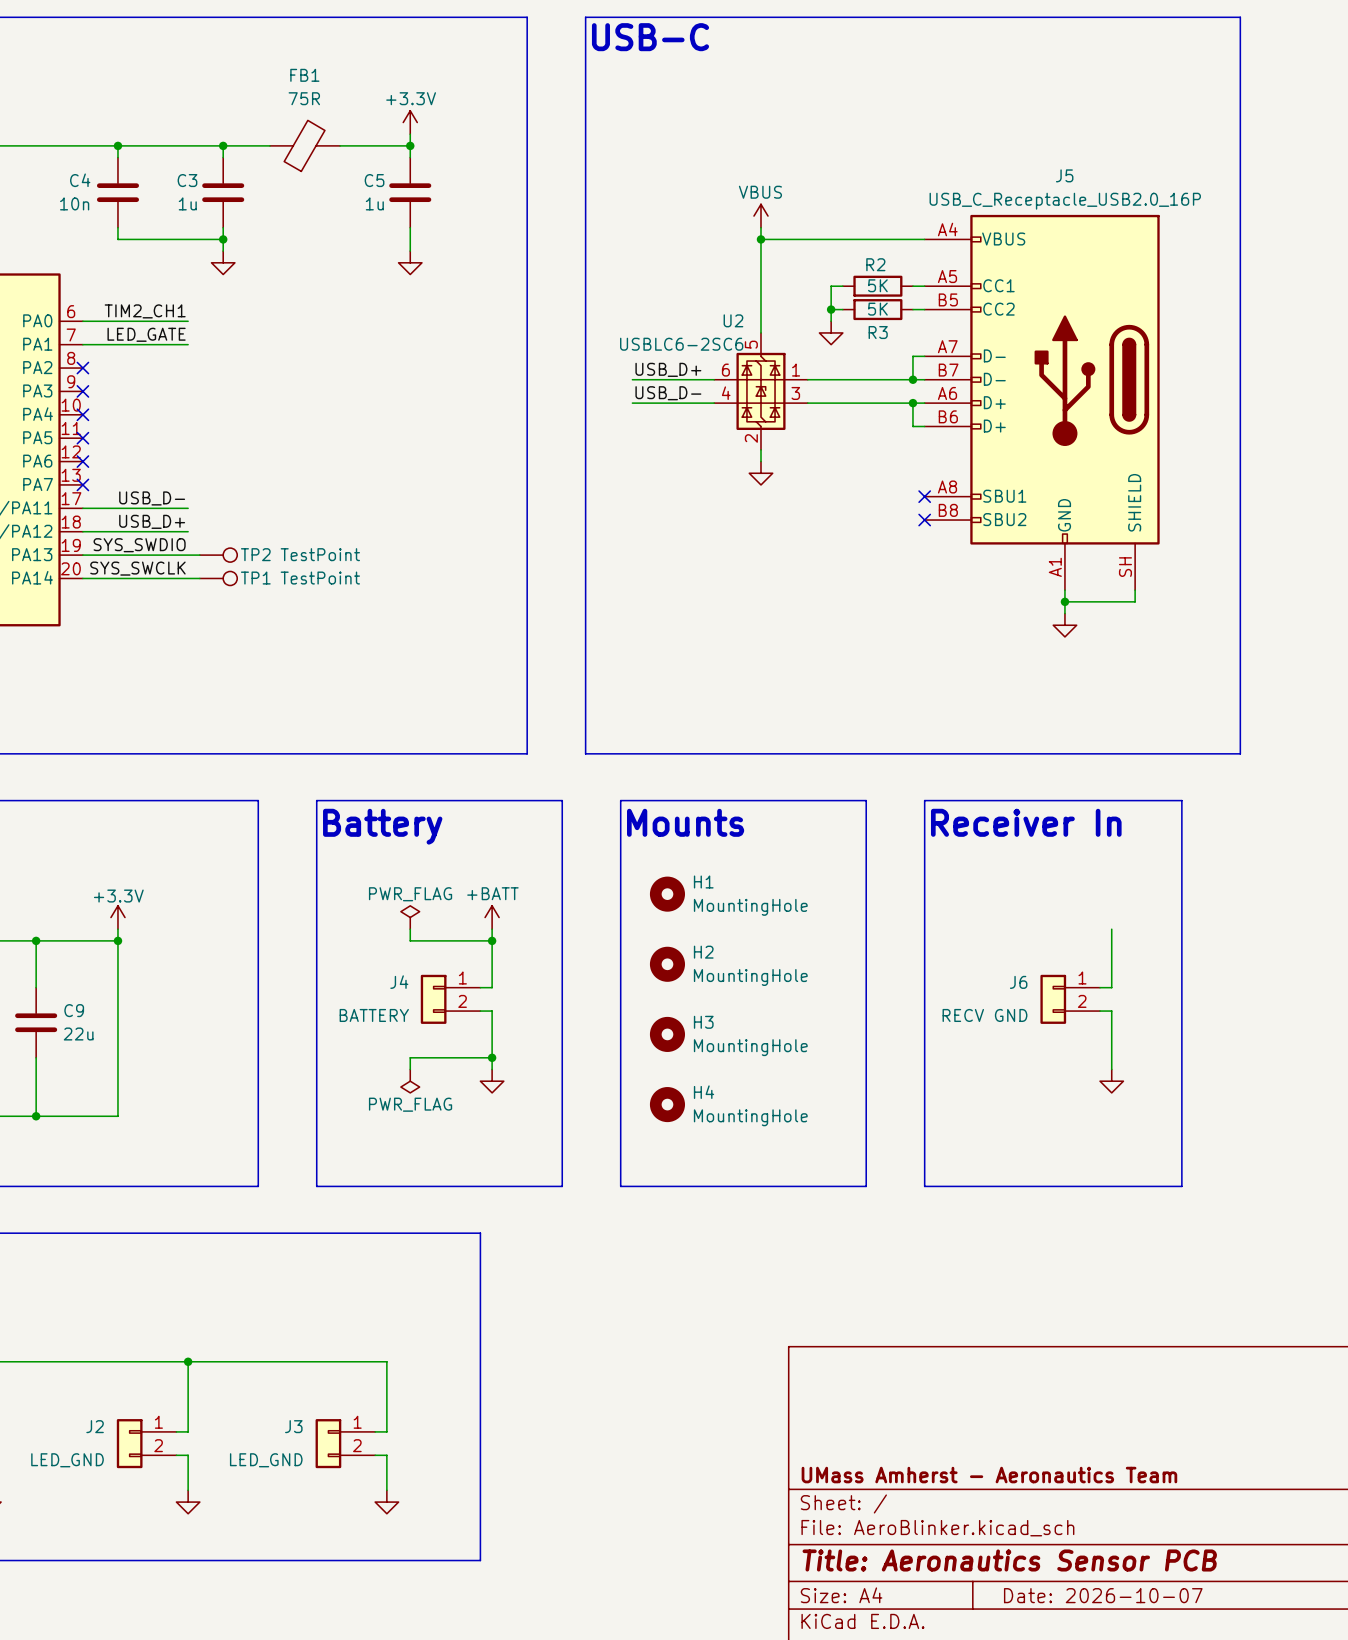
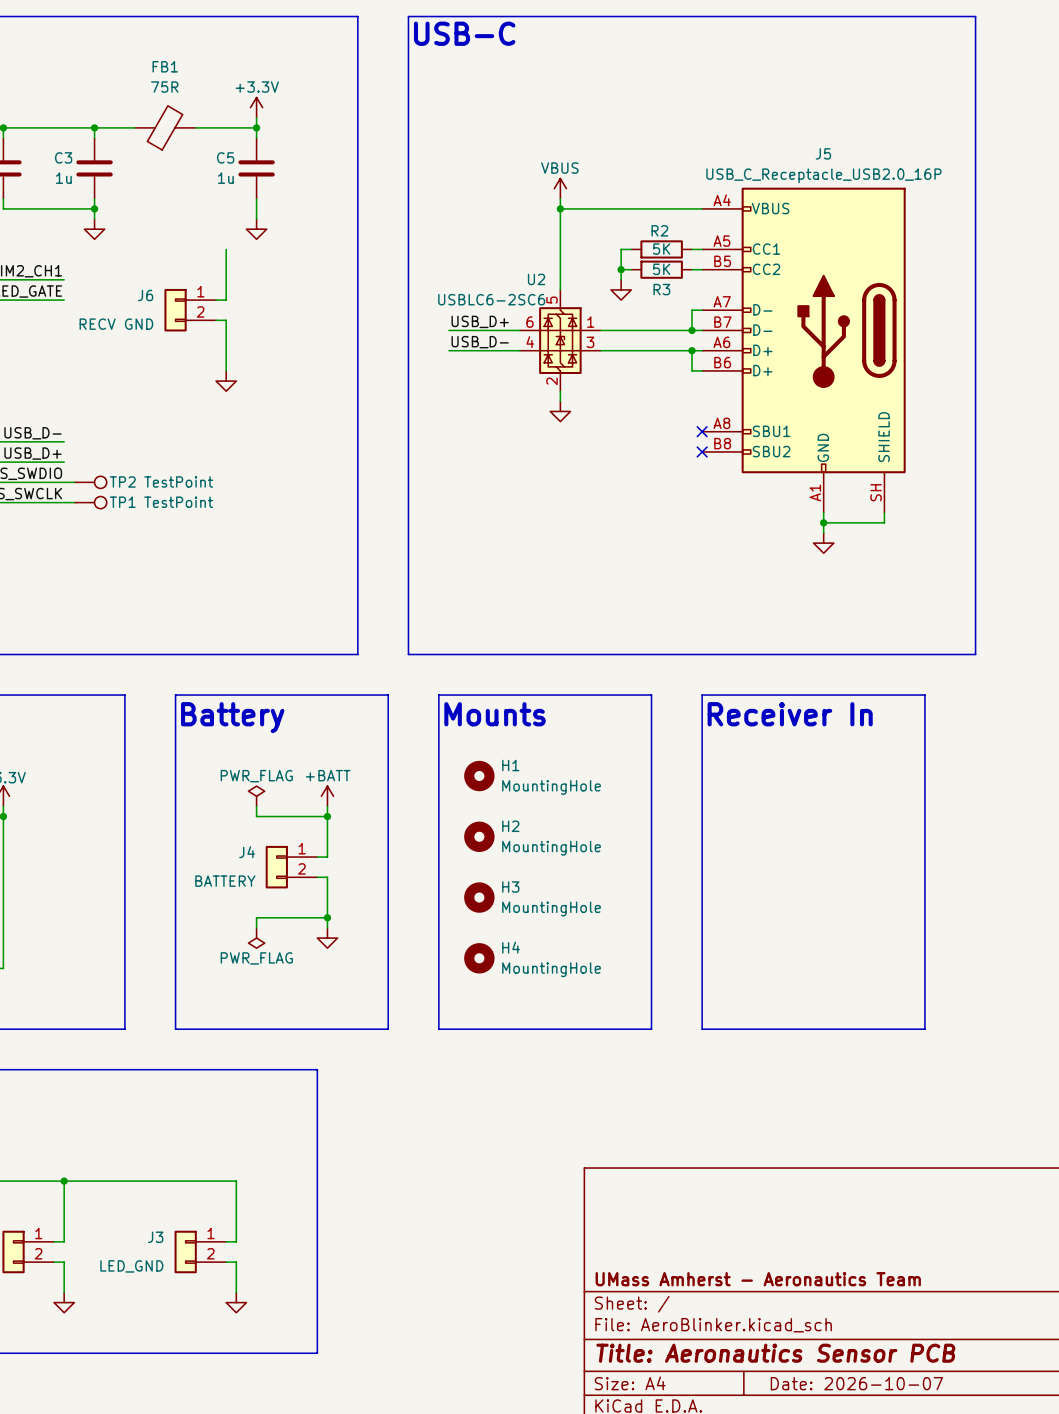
wire: none -> (226, 249) (226, 300) (216, 300)
wire: none -> (216, 320) (226, 320) (226, 370)
power symbol: none -> (226, 381)
wire: (1111, 929) (1111, 987) (1100, 987) -> none
J6 position: (1070, 999) -> (190, 310)
wire: (1100, 1011) (1111, 1011) (1111, 1069) -> none
power symbol: (1111, 1081) -> none

